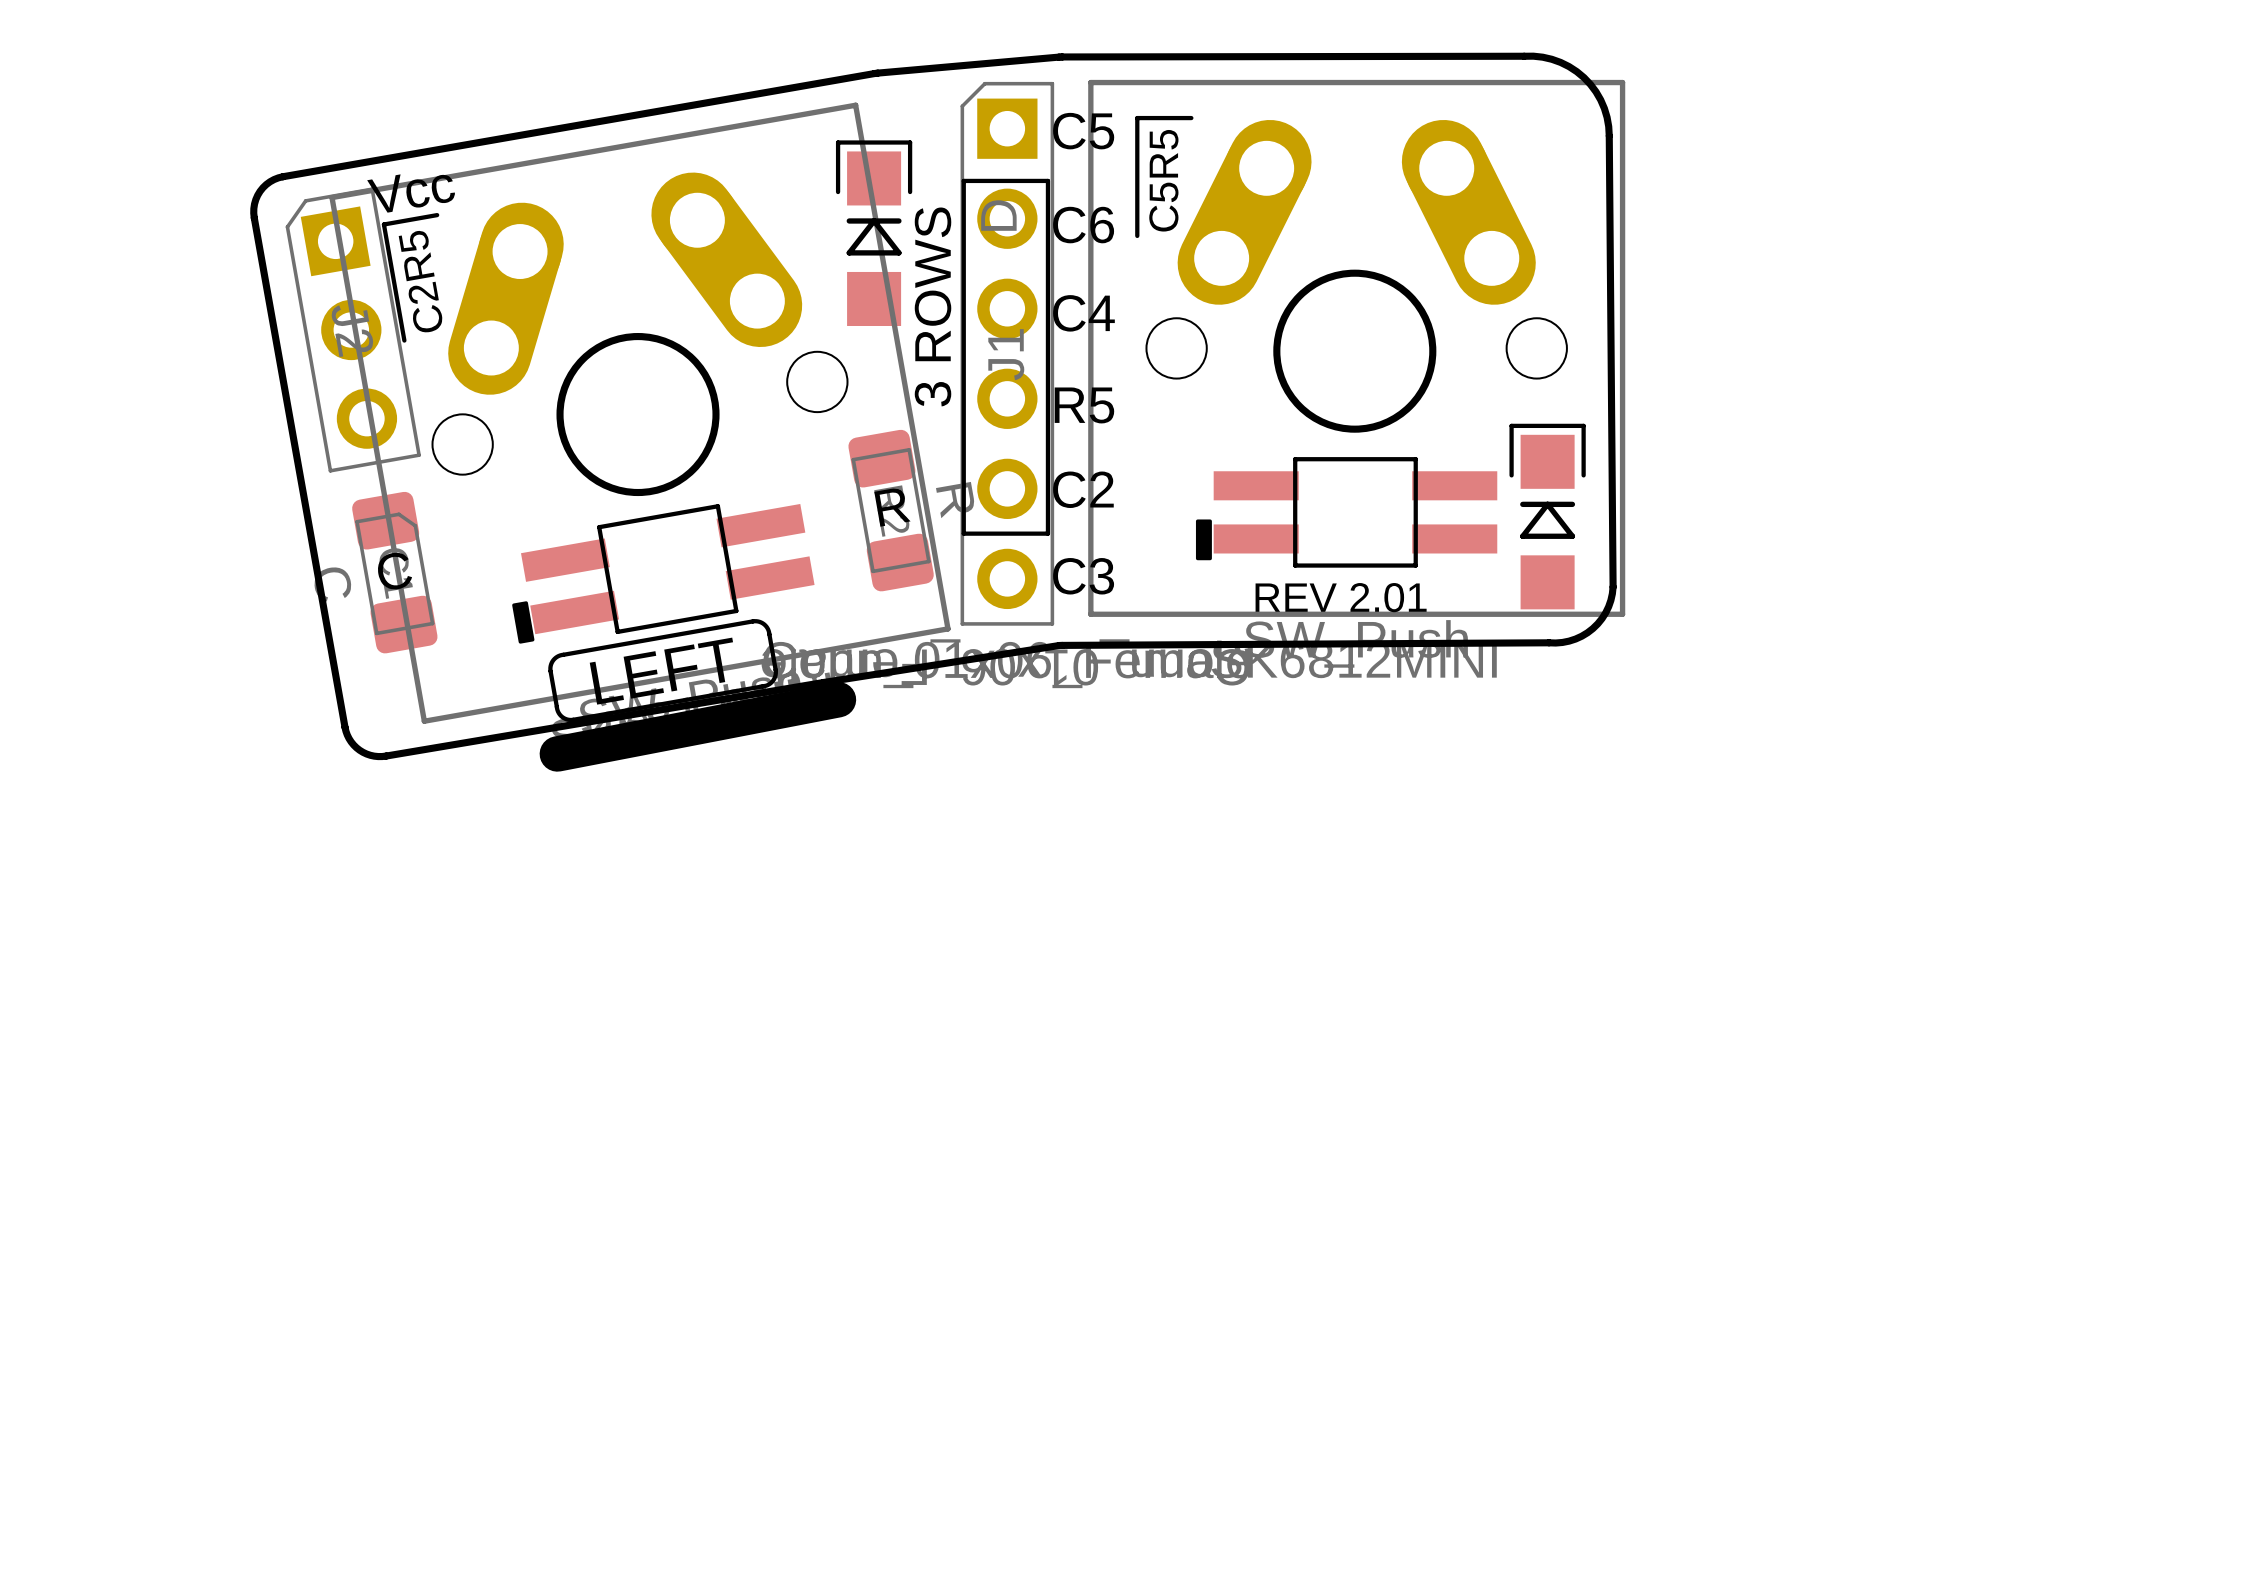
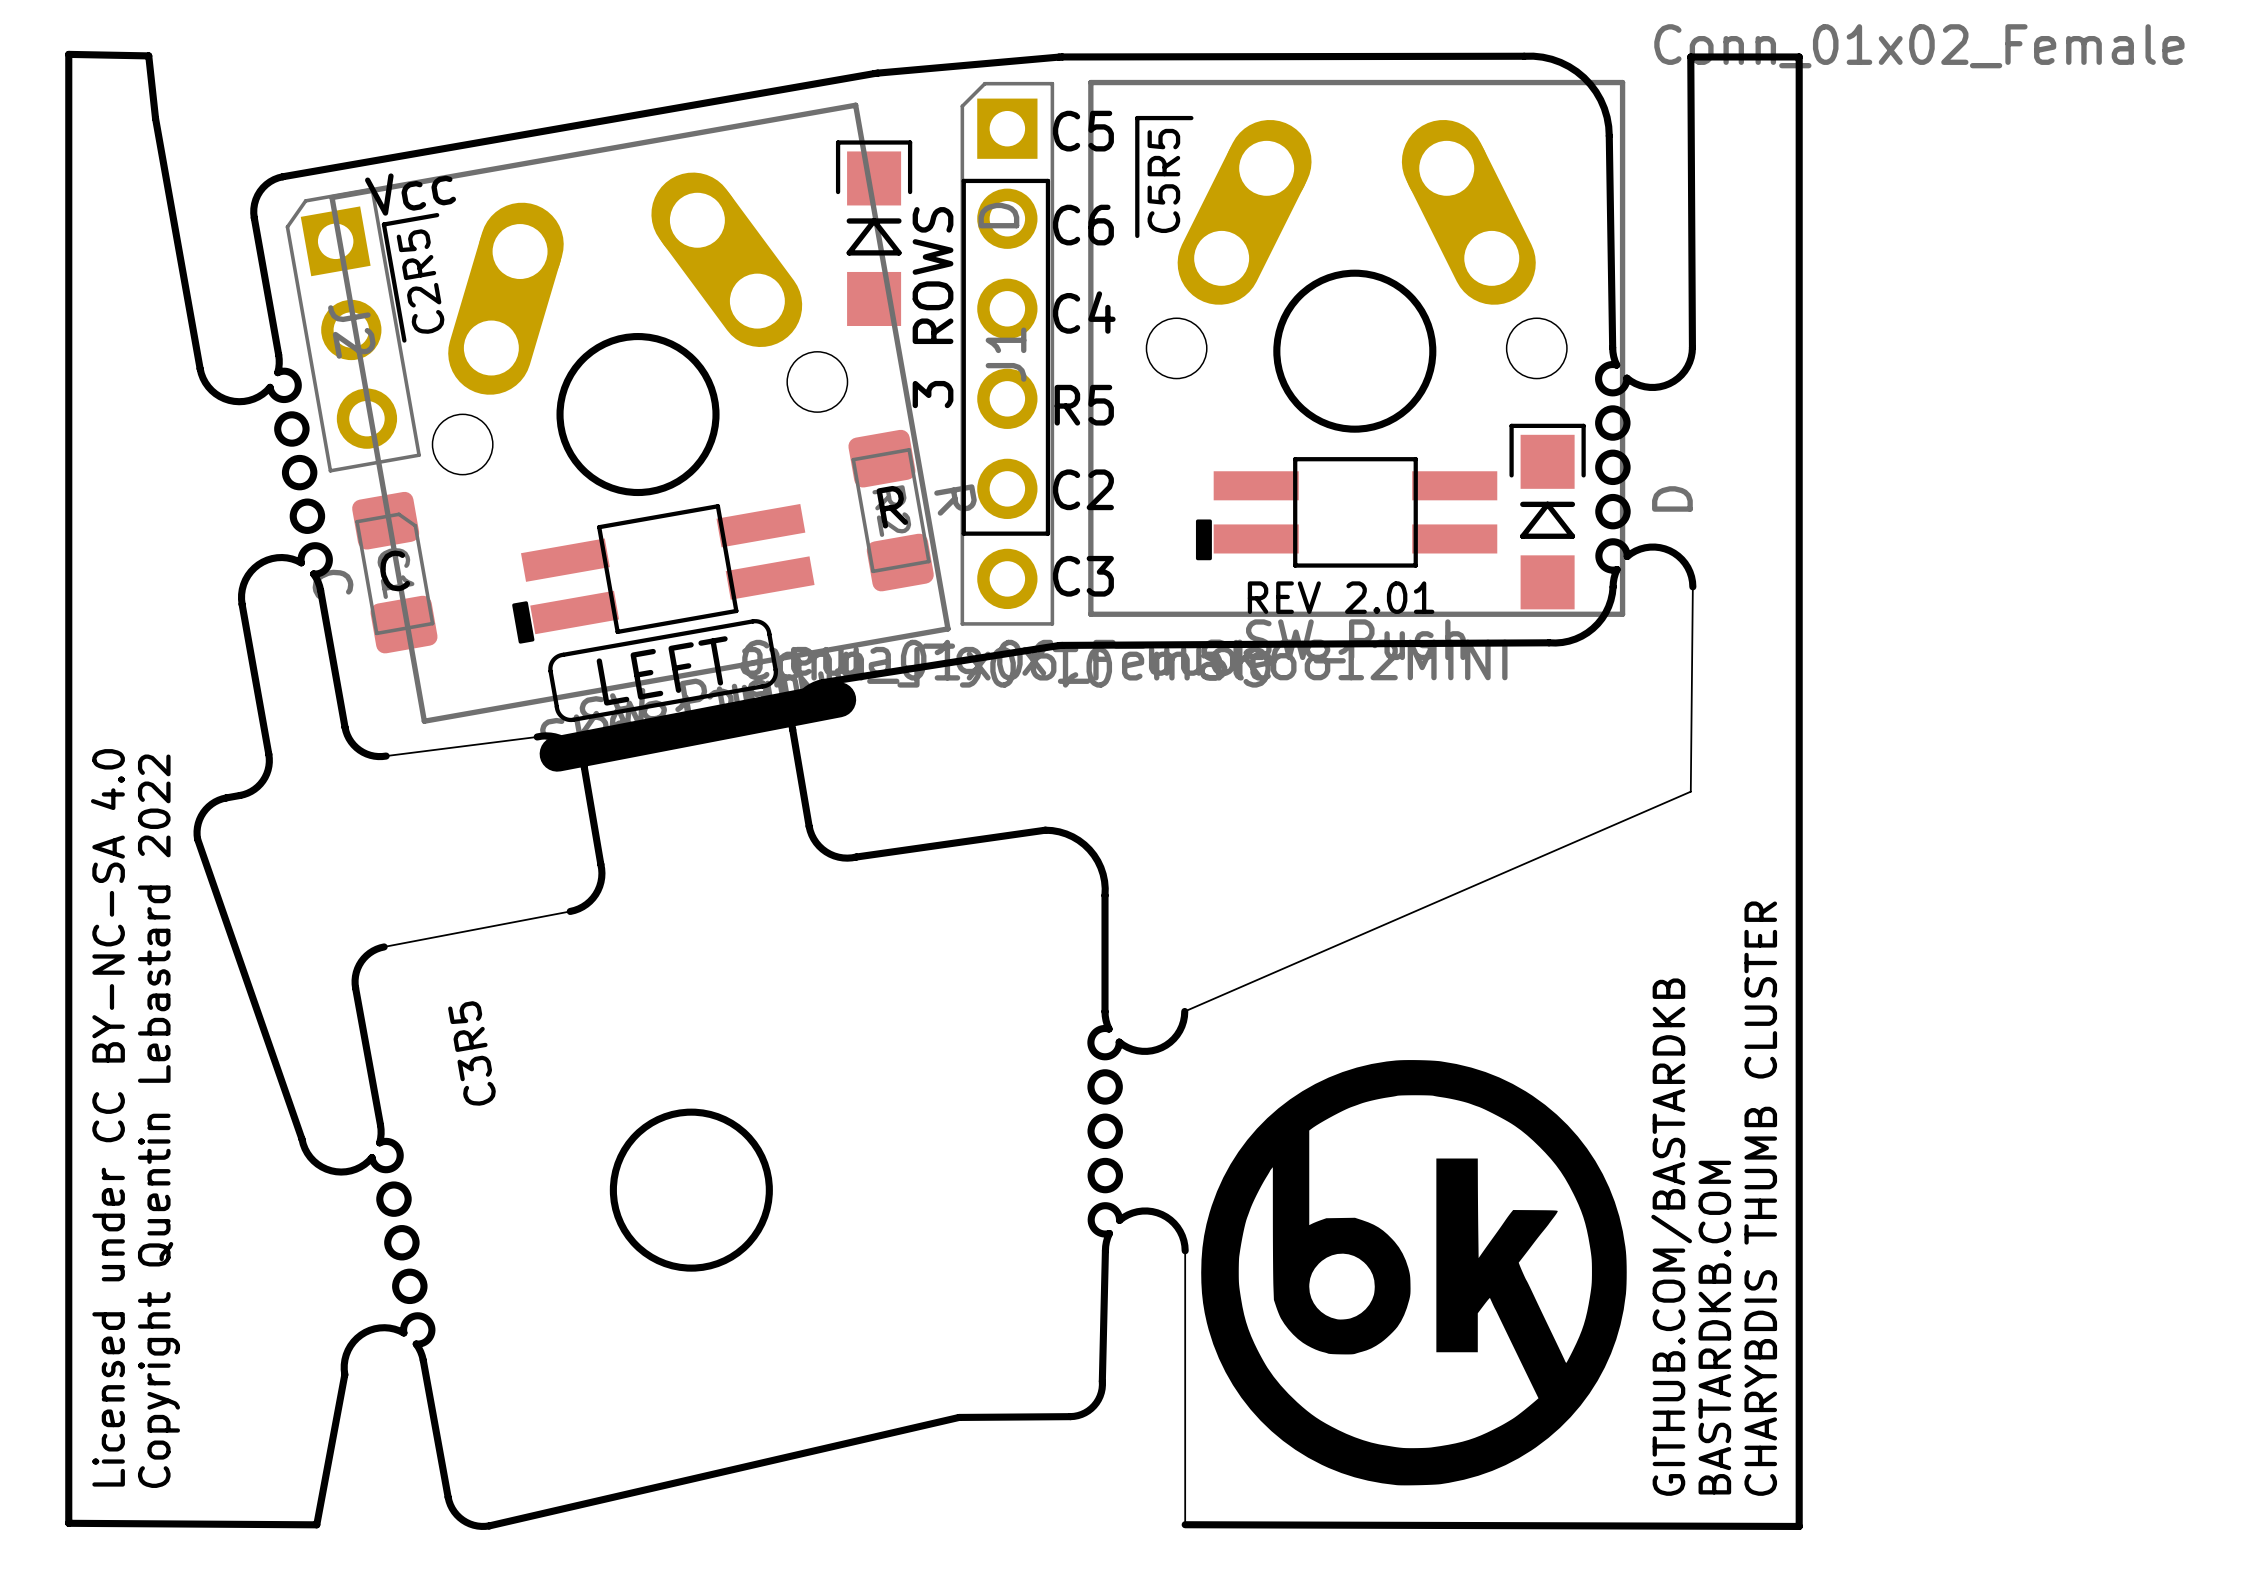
text: none -> Conn_01x02_Female (1919, 46)
board edge: (1609, 135) (1613, 586) -> (823, 682) (810, 687) (800, 695) (793, 707) (791, 720) (810, 830) (816, 842) (826, 851) (838, 857) (851, 857) (1045, 830) (1059, 831) (1072, 836) (1084, 844) (1094, 855) (1100, 867) (1105, 888) (1105, 1011) (1109, 1029) (1101, 1028) (1095, 1032) (1090, 1043) (1095, 1052) (1106, 1056) (1115, 1051) (1119, 1042) (1137, 1050) (1152, 1050) (1161, 1047) (1177, 1035) (1183, 1021) (1184, 1011) (1690, 791) (1692, 586) (1690, 572) (1678, 556) (1665, 548) (1645, 547) (1627, 556) (1622, 545) (1610, 541) (1601, 547) (1598, 557) (1605, 567) (1617, 569) (1613, 586)
board edge: none -> (1609, 135) (1612, 347) (1616, 365) (1609, 364) (1603, 368) (1598, 379) (1602, 388) (1612, 392) (1622, 389) (1626, 378) (1640, 385) (1649, 387) (1669, 383) (1684, 371) (1691, 357) (1690, 56) (1799, 56) (1799, 1526) (1185, 1524) (1183, 1240) (1177, 1227) (1162, 1214) (1142, 1211) (1132, 1213) (1119, 1220) (1116, 1210) (1104, 1205) (1095, 1209) (1091, 1219) (1096, 1230) (1102, 1233) (1109, 1233) (1105, 1250) (1102, 1388) (1094, 1405) (1077, 1415) (959, 1417) (489, 1525) (477, 1526) (459, 1517) (449, 1501) (423, 1360) (416, 1344) (423, 1343) (428, 1338) (431, 1326) (425, 1318) (415, 1315) (406, 1321) (403, 1332) (389, 1328) (374, 1328) (361, 1335) (348, 1350) (316, 1524) (68, 1523) (68, 54) (148, 55) (155, 118) (200, 368) (205, 382) (219, 396) (234, 401) (253, 398) (270, 387) (276, 397) (288, 398) (296, 391) (297, 381) (289, 372) (277, 372) (278, 354)
board edge: (278, 354) (320, 590) -> (386, 756) (541, 736) (550, 736) (563, 739) (574, 747) (583, 763) (601, 877) (599, 886) (593, 898) (582, 906) (574, 910) (384, 946) (373, 950) (363, 958) (356, 972) (355, 984) (380, 1125) (379, 1142) (386, 1141) (393, 1143) (399, 1150) (400, 1157) (396, 1165) (388, 1169) (378, 1167) (372, 1157) (355, 1169) (336, 1171) (317, 1164) (305, 1148) (197, 835) (199, 819) (208, 806) (218, 800) (244, 794) (254, 789) (262, 780) (268, 766) (268, 754) (242, 604) (242, 589) (245, 579) (258, 564) (272, 558) (287, 557) (301, 562) (304, 551) (309, 546) (316, 545) (325, 550) (329, 558) (325, 570) (313, 573) (320, 590)
round board edge: none -> [1595, 405, 1631, 441]
round board edge: none -> [274, 411, 310, 447]
round board edge: none -> [1595, 449, 1631, 486]
round board edge: none -> [281, 454, 318, 491]
round board edge: none -> [1595, 493, 1631, 530]
round board edge: none -> [289, 498, 326, 534]
part value: none -> D (1672, 498)
board edge: (823, 682) (386, 756) -> none
text: none -> C3R5 (471, 1053)
drawing: none -> [1201, 1060, 1627, 1486]
round board edge: none -> [1087, 1069, 1123, 1105]
round board edge: none -> [609, 1108, 773, 1272]
round board edge: none -> [1087, 1113, 1123, 1149]
round board edge: none -> [1087, 1157, 1124, 1194]
text: none -> Licensed under CC BY-NC-SA 4.0 (107, 1117)
text: none -> Copyright Quentin Lebastard 2022 (158, 1121)
round board edge: none -> [376, 1181, 412, 1217]
text: none -> CHARYBDIS THUMB CLUSTER (1760, 1198)
round board edge: none -> [384, 1225, 420, 1261]
text: none -> GITHUB.COM/BASTARDKB (1671, 1237)
round board edge: none -> [392, 1268, 428, 1305]
text: none -> BASTARDKB.COM (1714, 1327)

